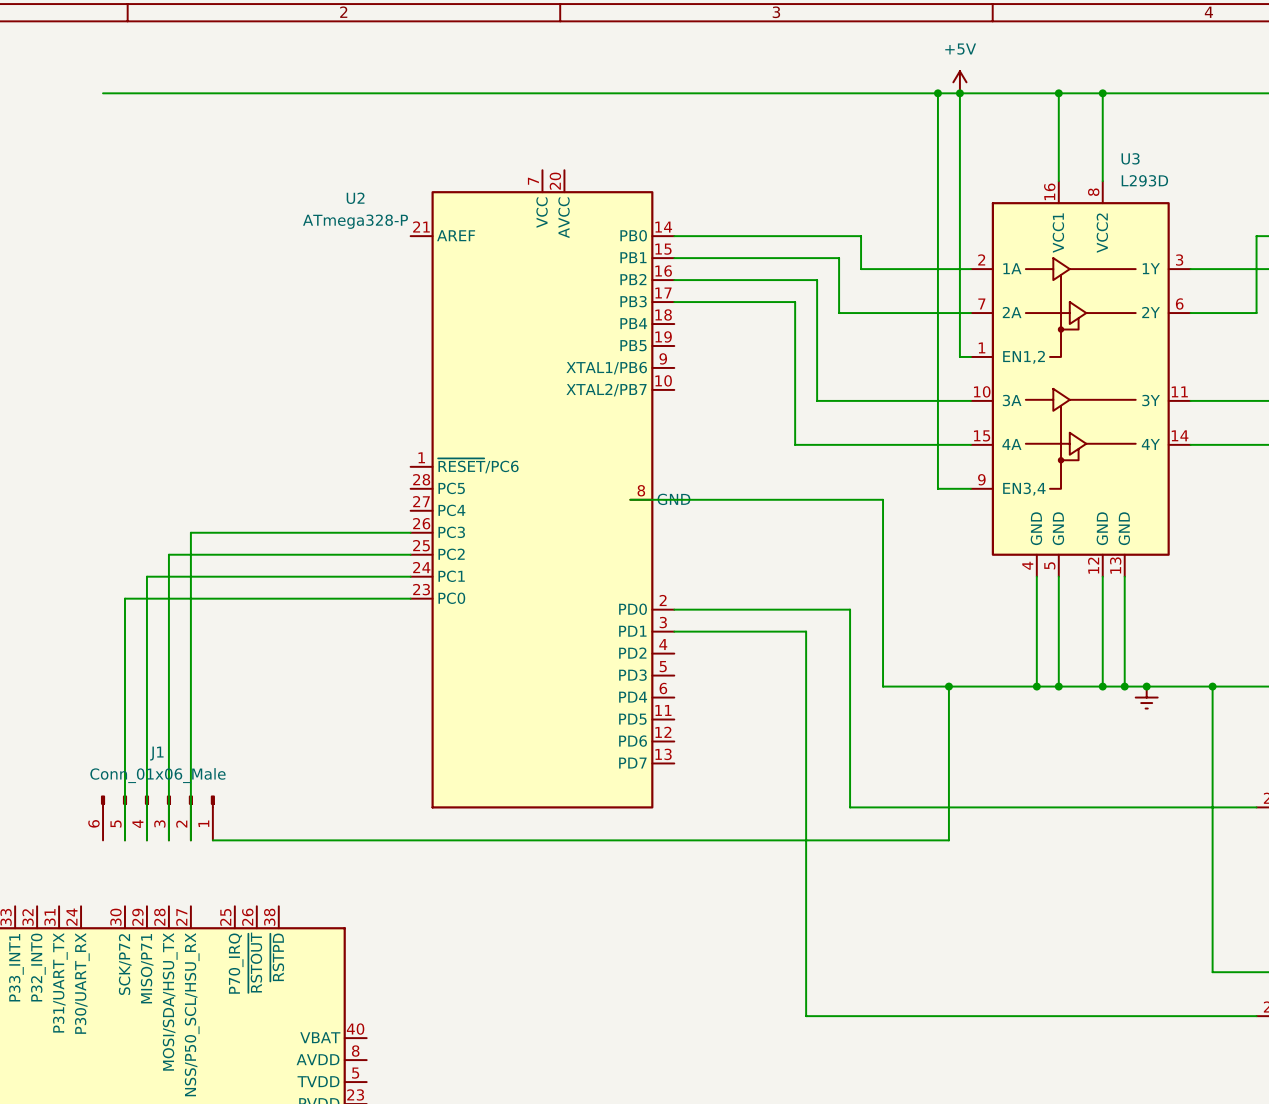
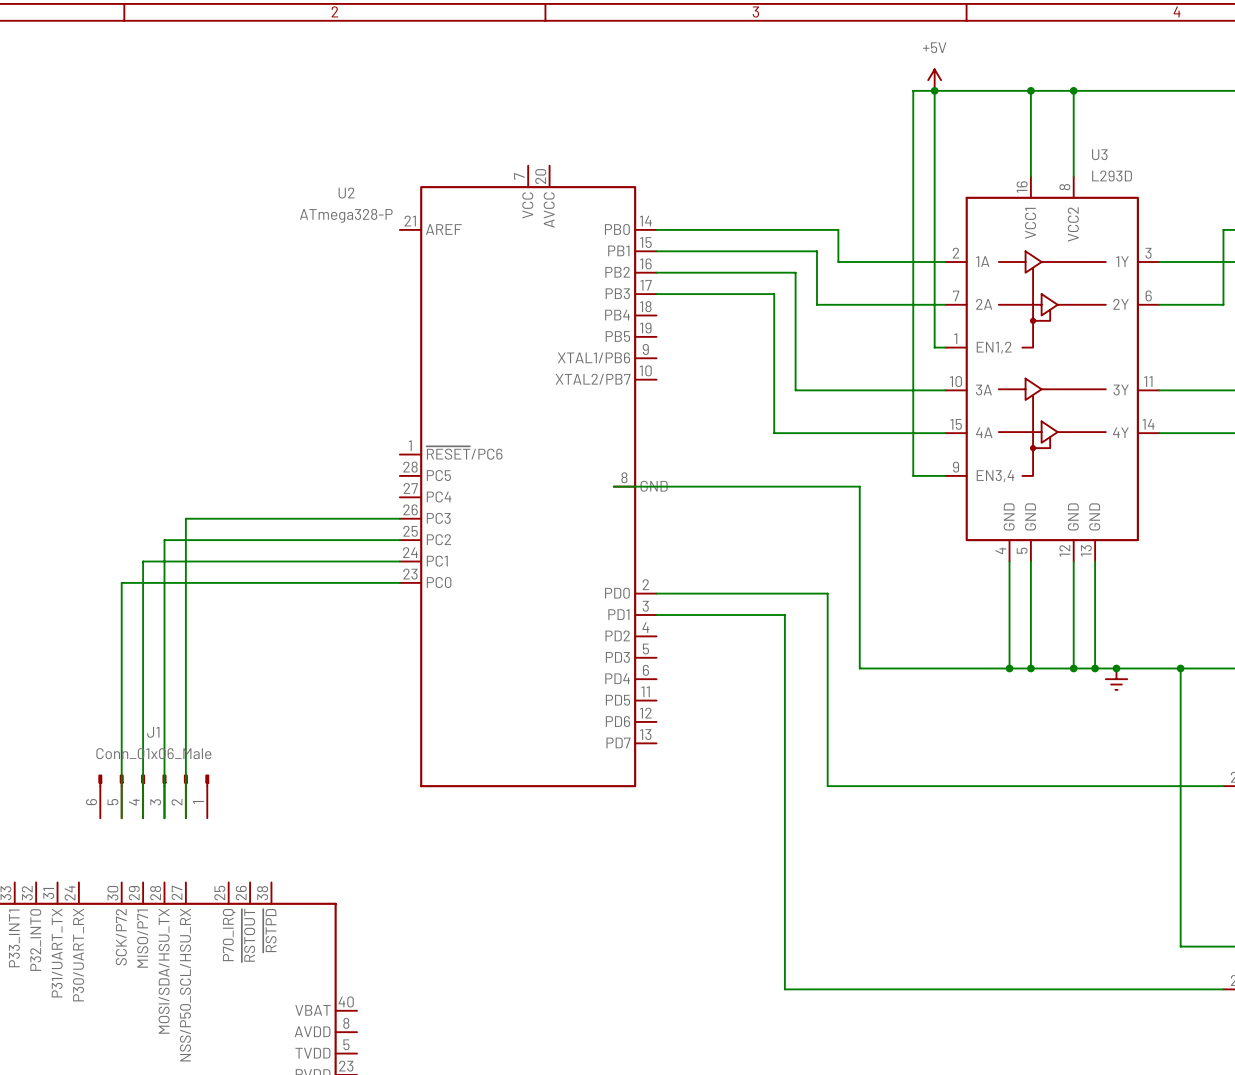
wire: (103, 93) (937, 93) -> none
junction: (937, 93) -> none
wire: (948, 686) (948, 840) (212, 840) -> none
junction: (948, 686) -> none

